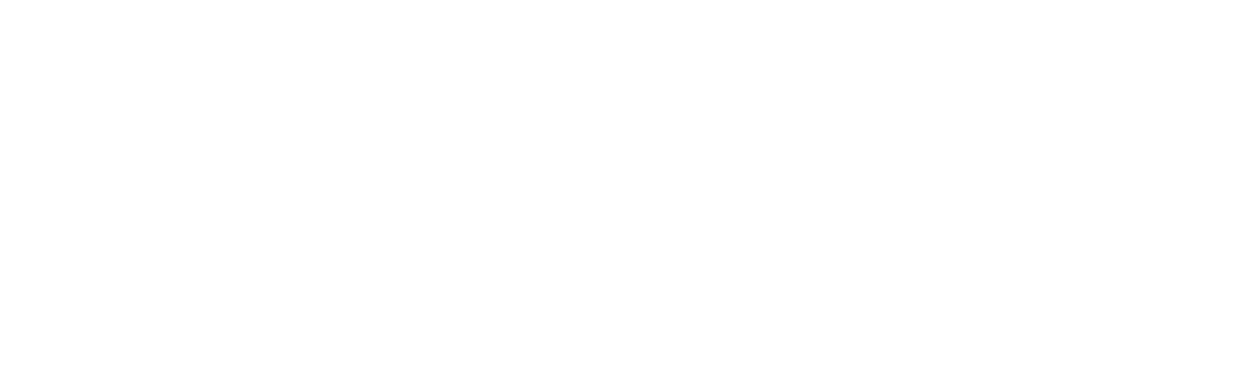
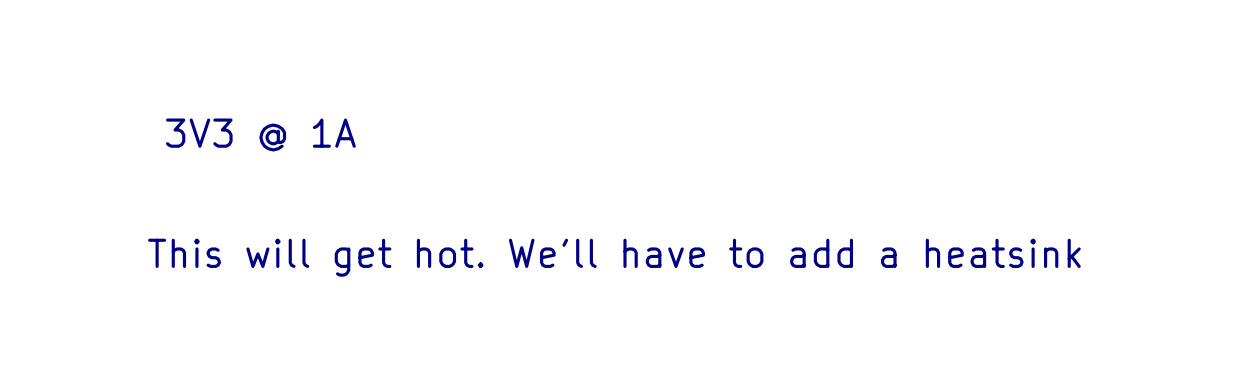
text: none -> 3V3 @ 1A (260, 135)
text: none -> This will get hot. We'll have to add a heatsink (614, 257)

